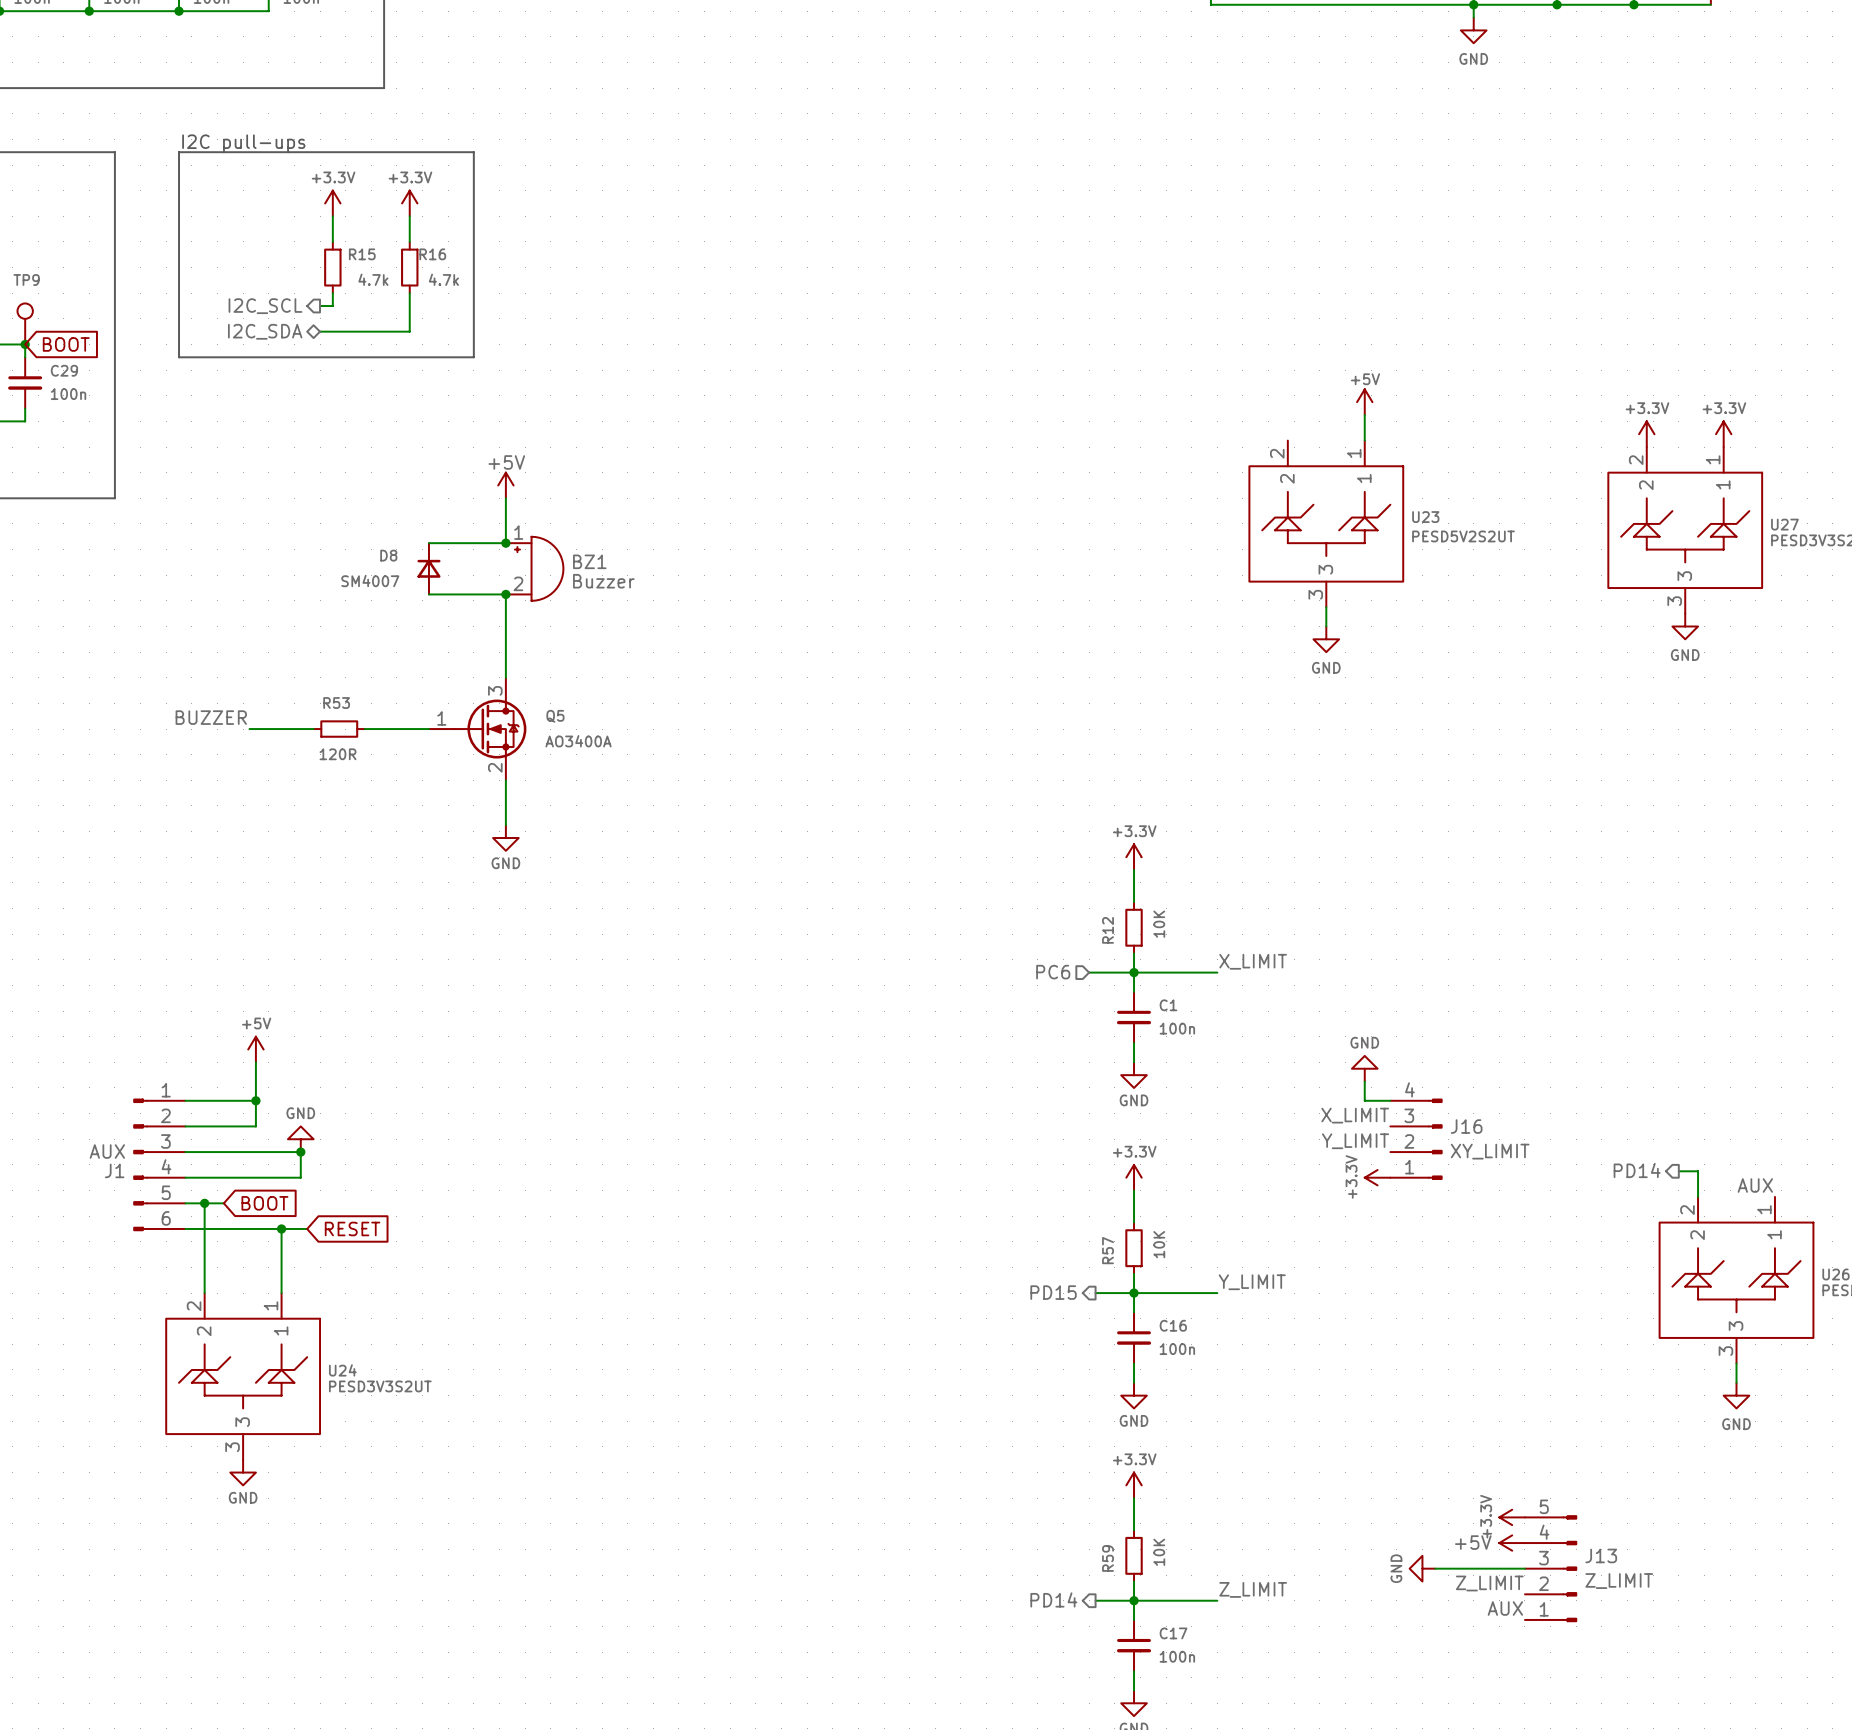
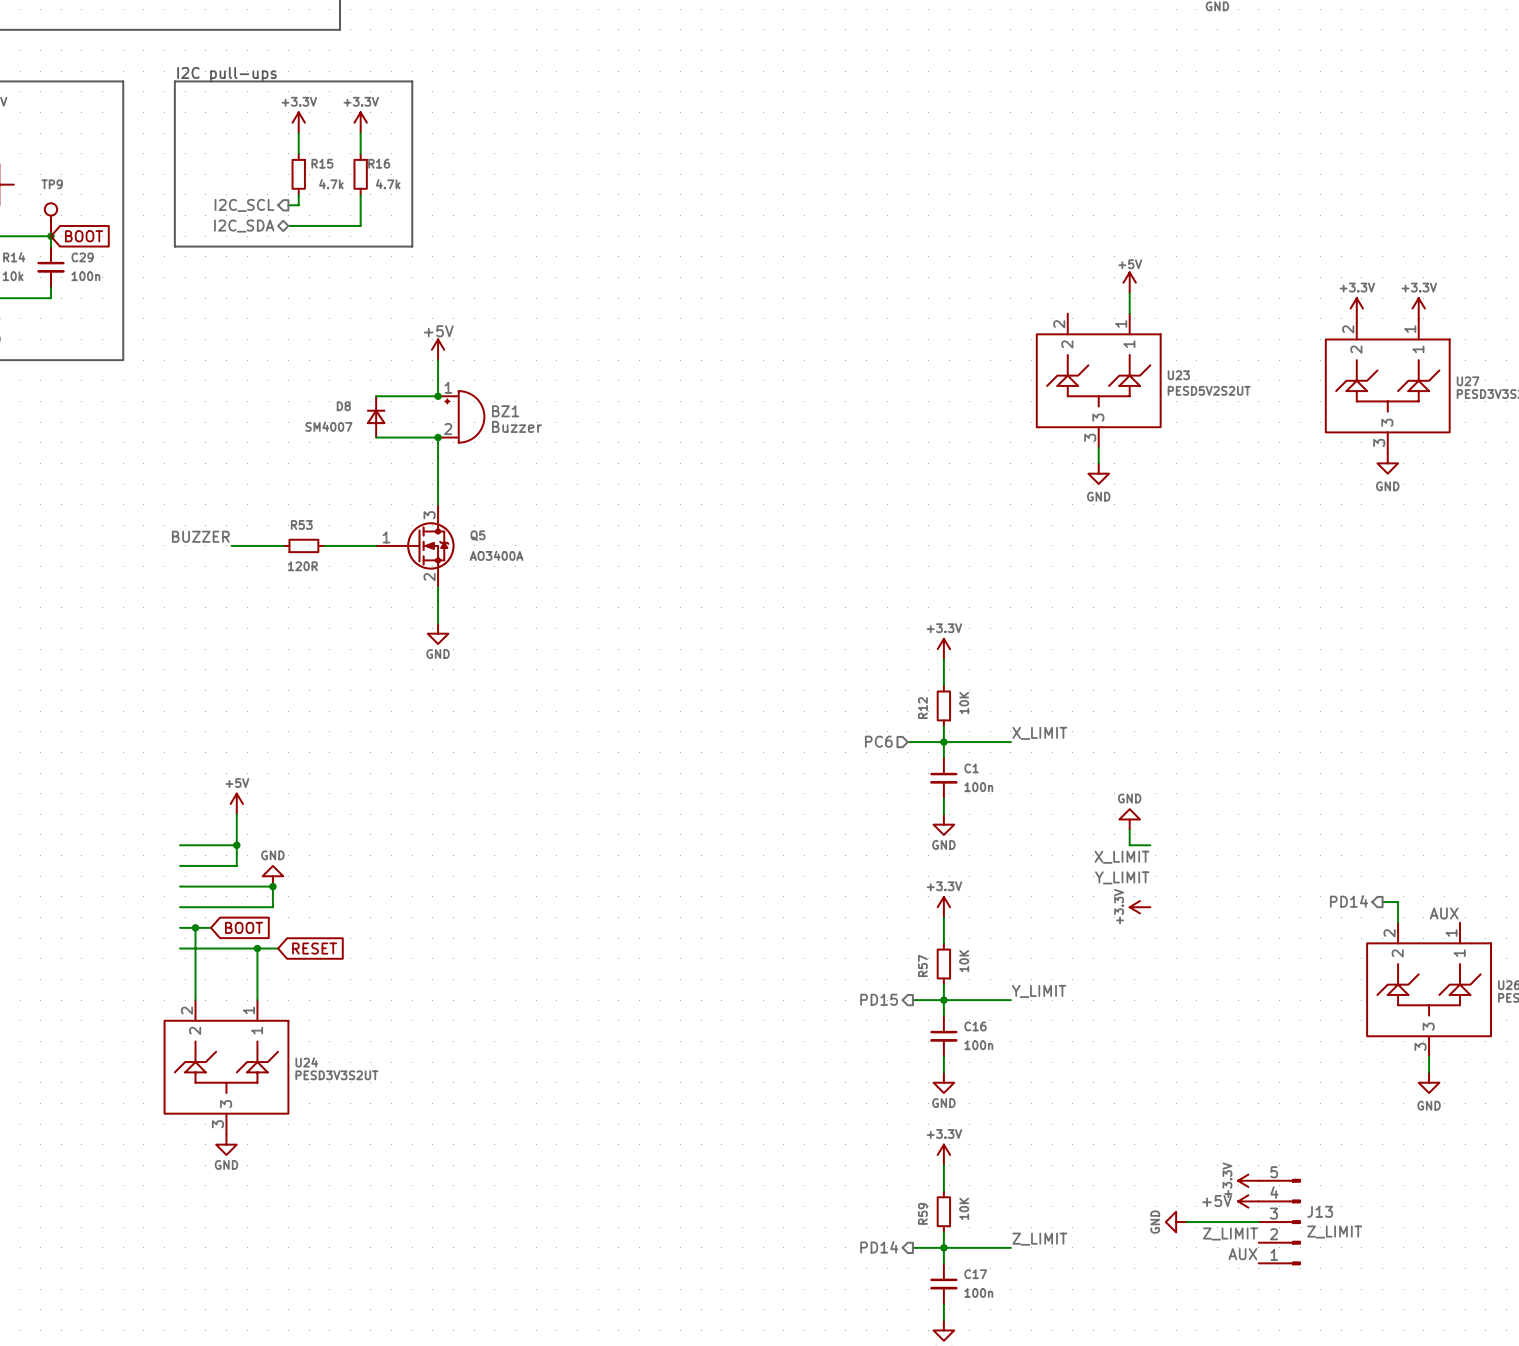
J16: XY_LIMIT (1416, 1139) -> none
J1: AUX (159, 1164) -> none

